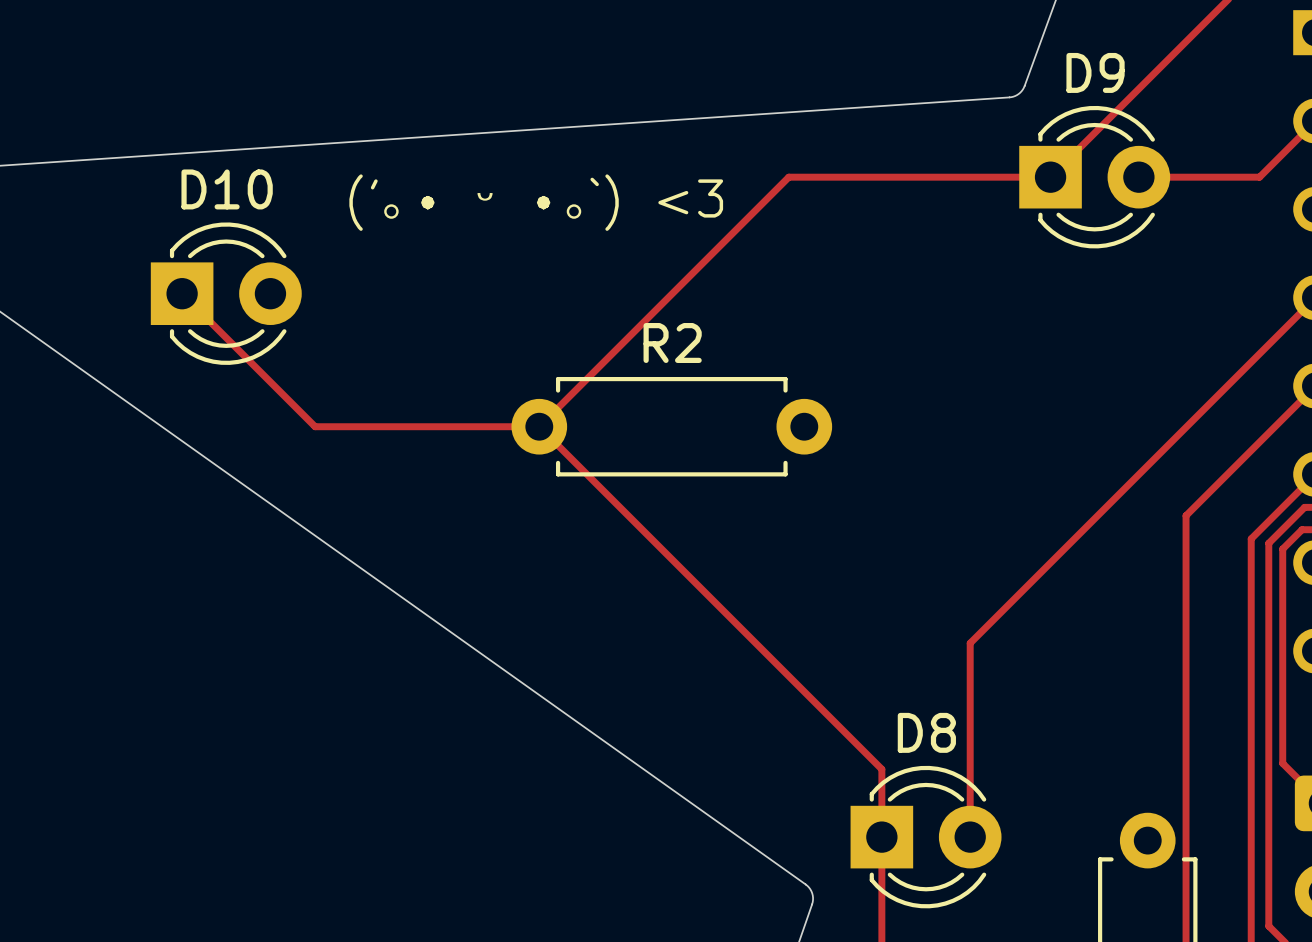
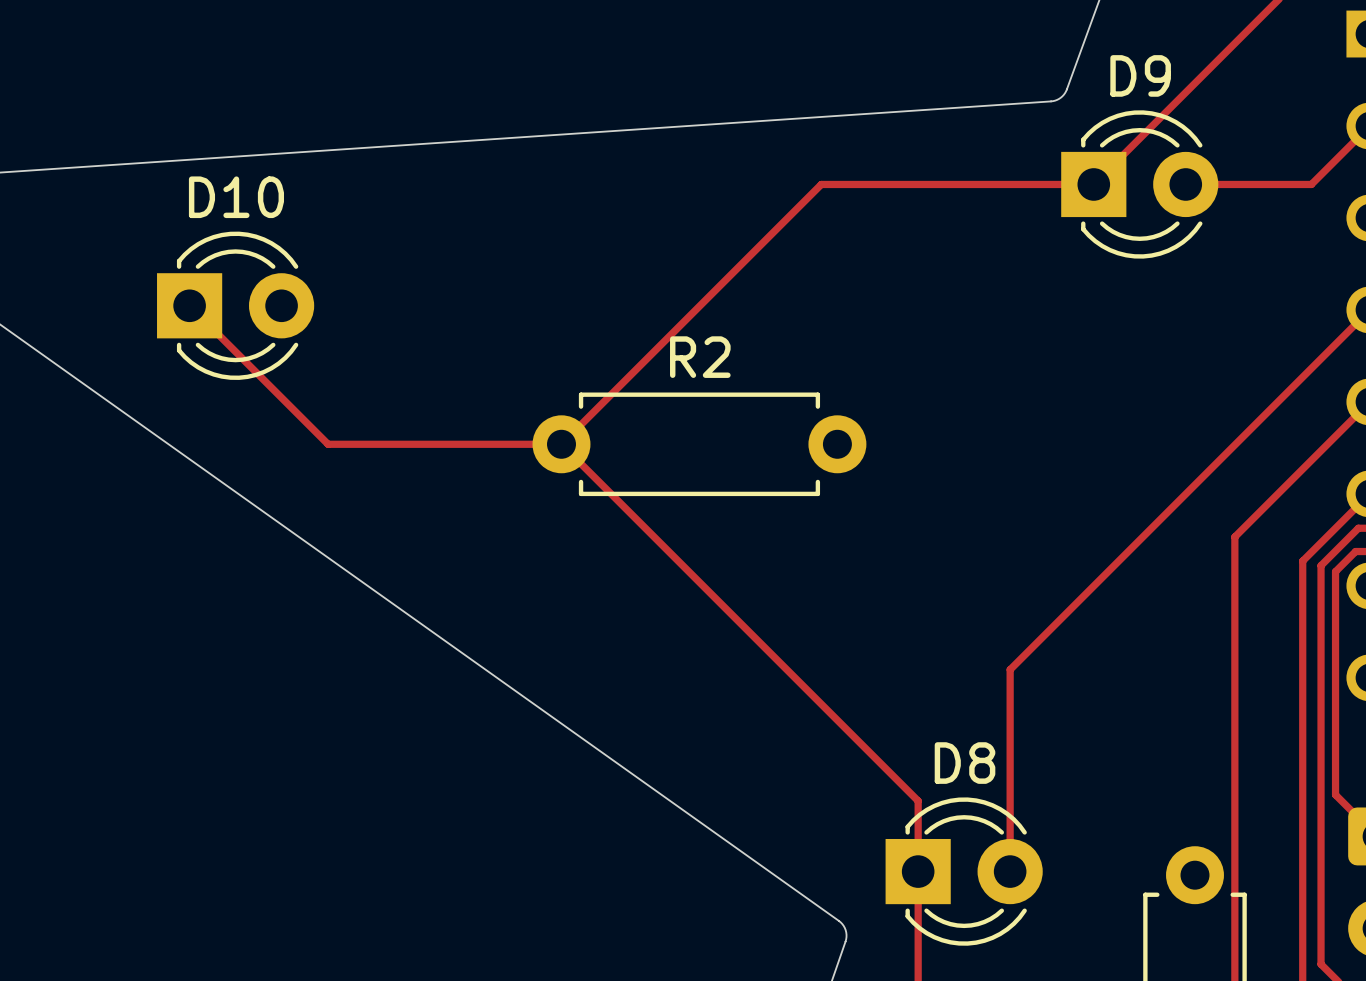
text: ('｡• ᵕ •｡`) <3 (536, 202) -> none

